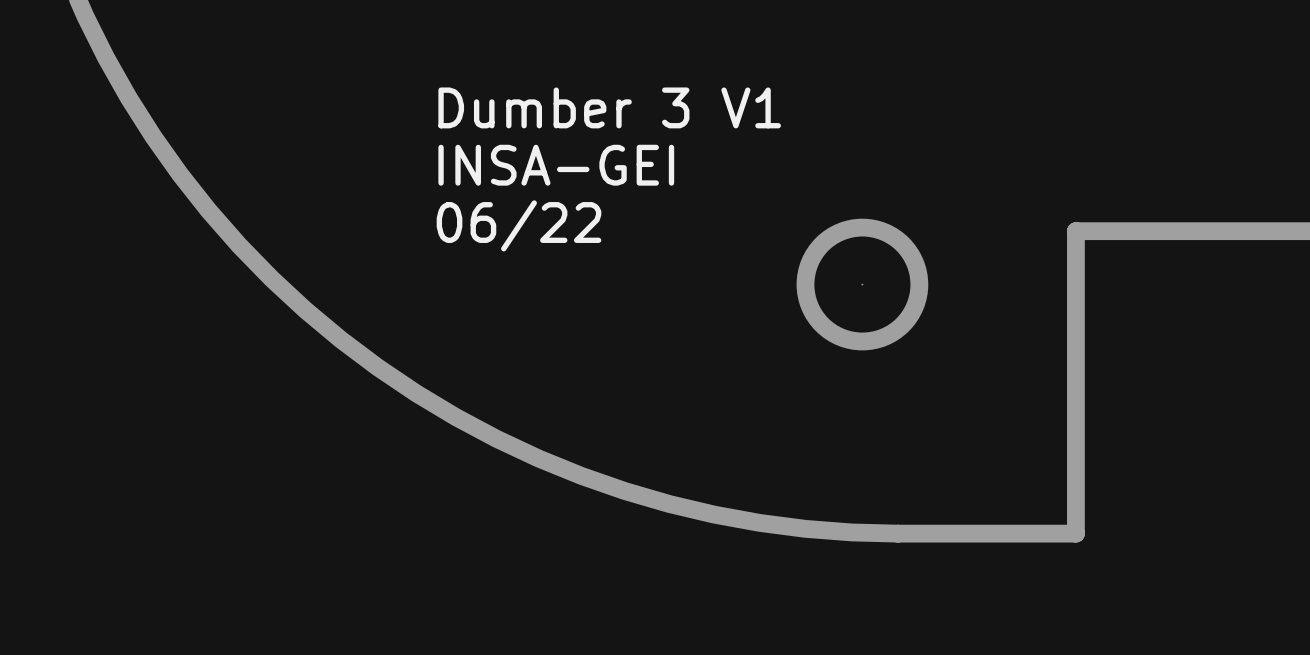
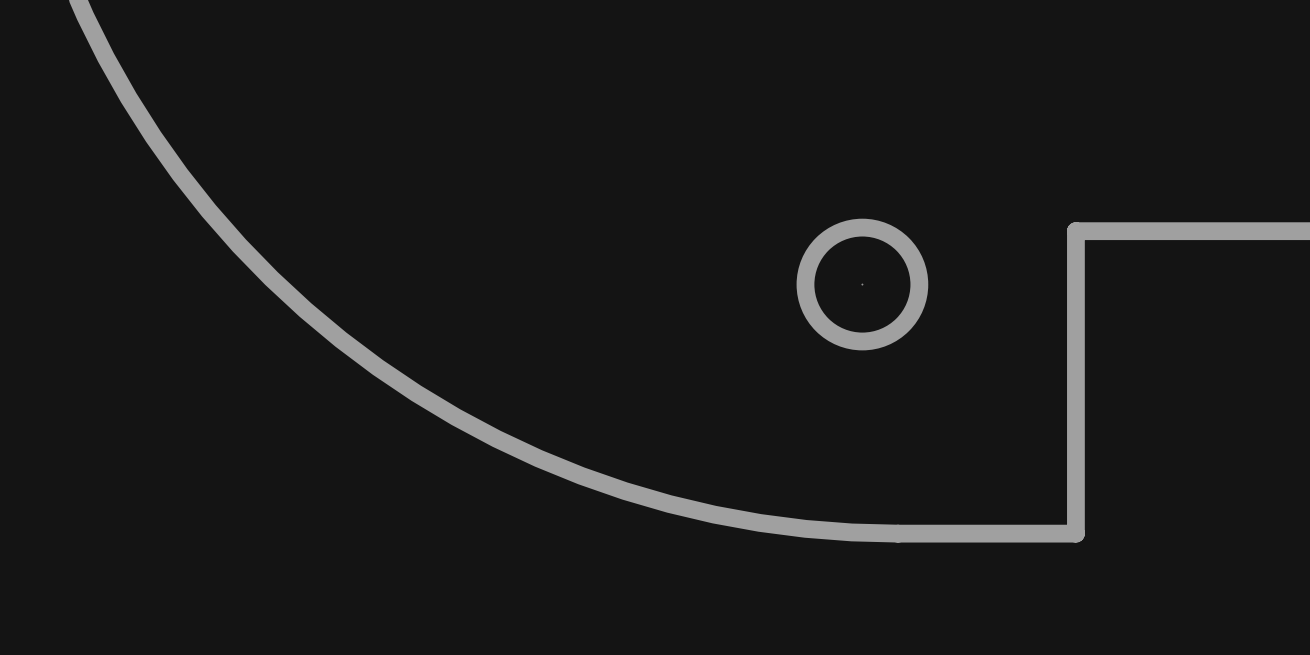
text: Dumber 3 V1 (609, 107) -> none
text: INSA-GEI (556, 165) -> none
text: 06/22 (519, 225) -> none

